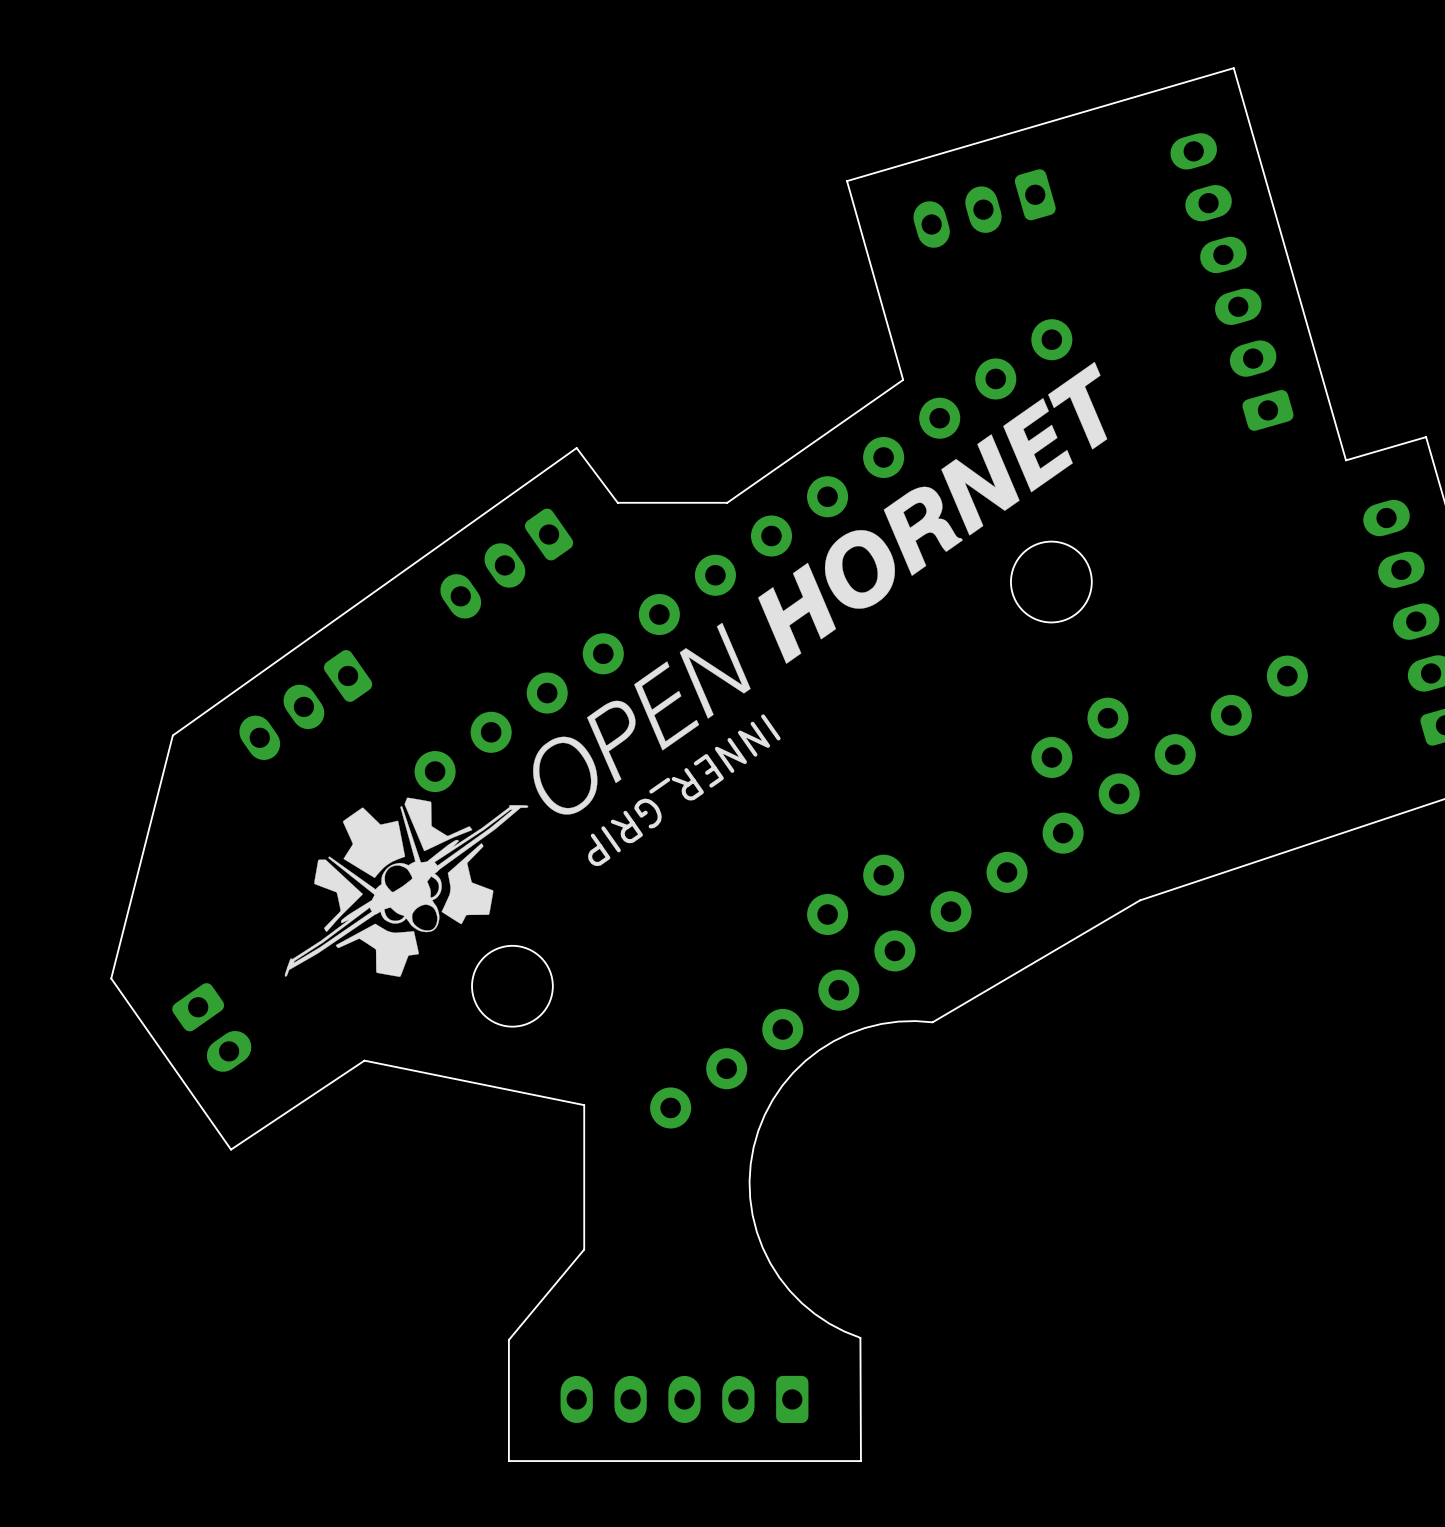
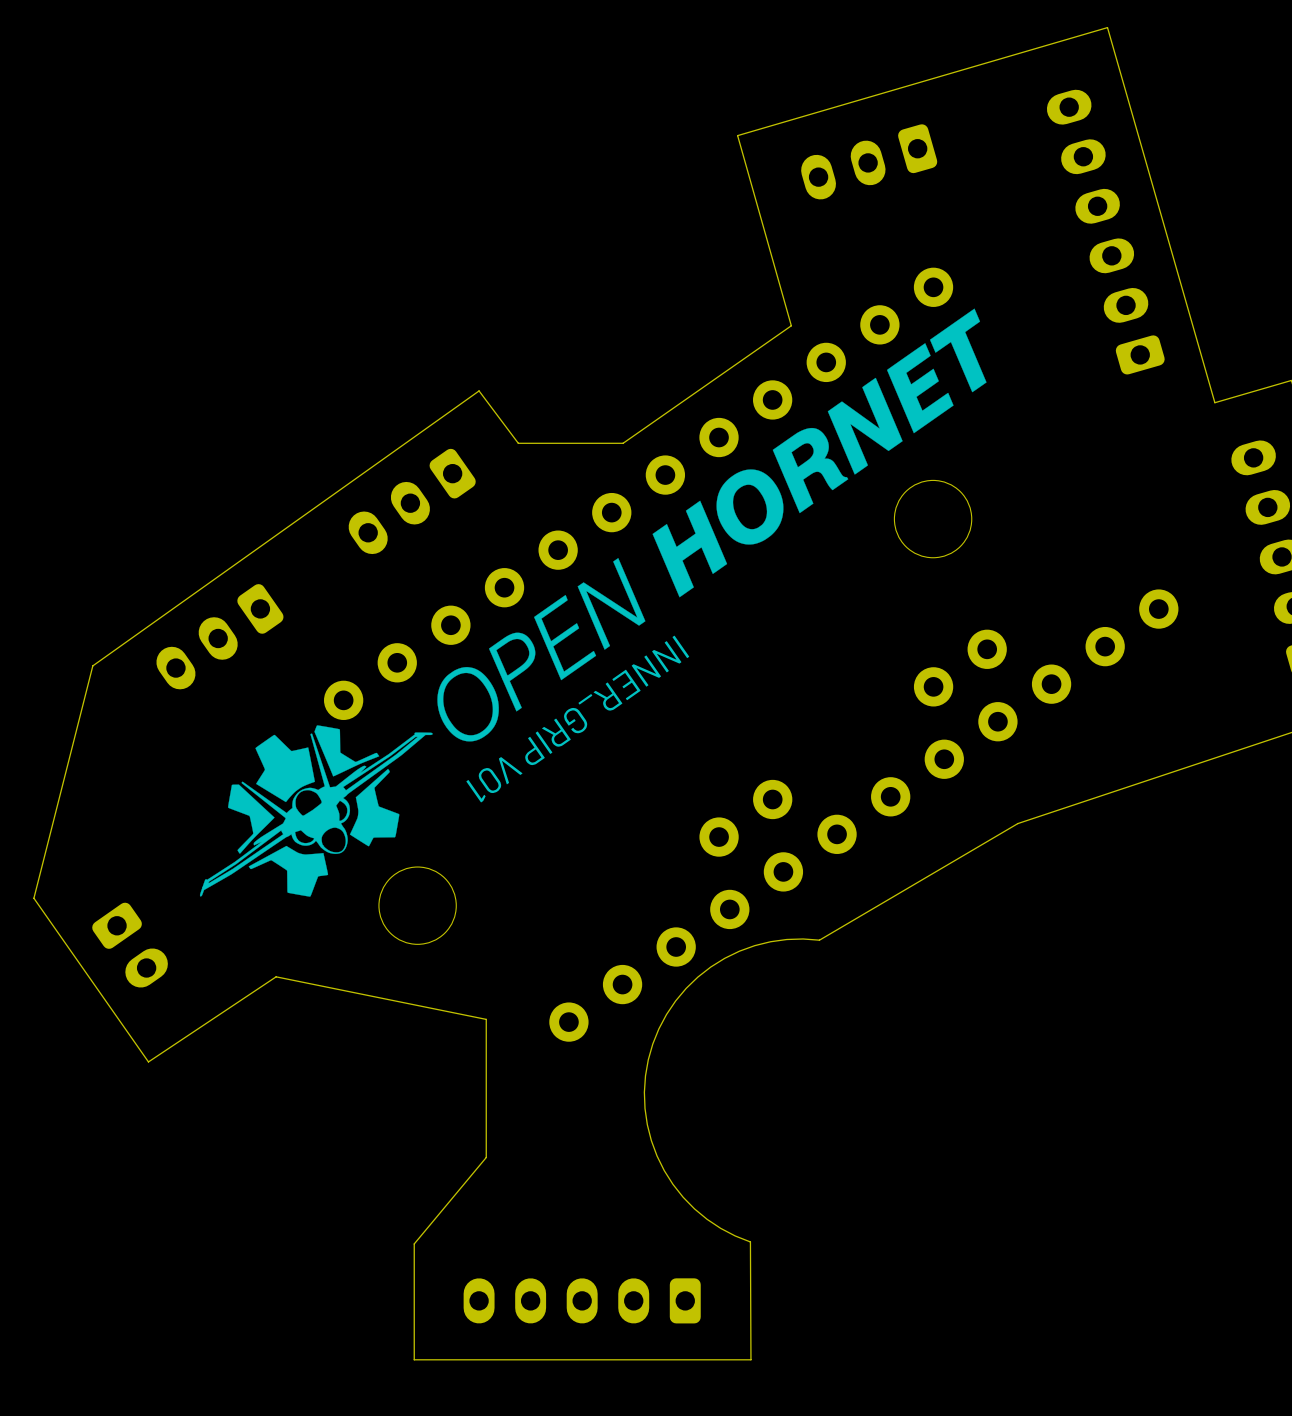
text: INNER_GRIP (684, 790) -> INNER_GRIP V01 (577, 719)

